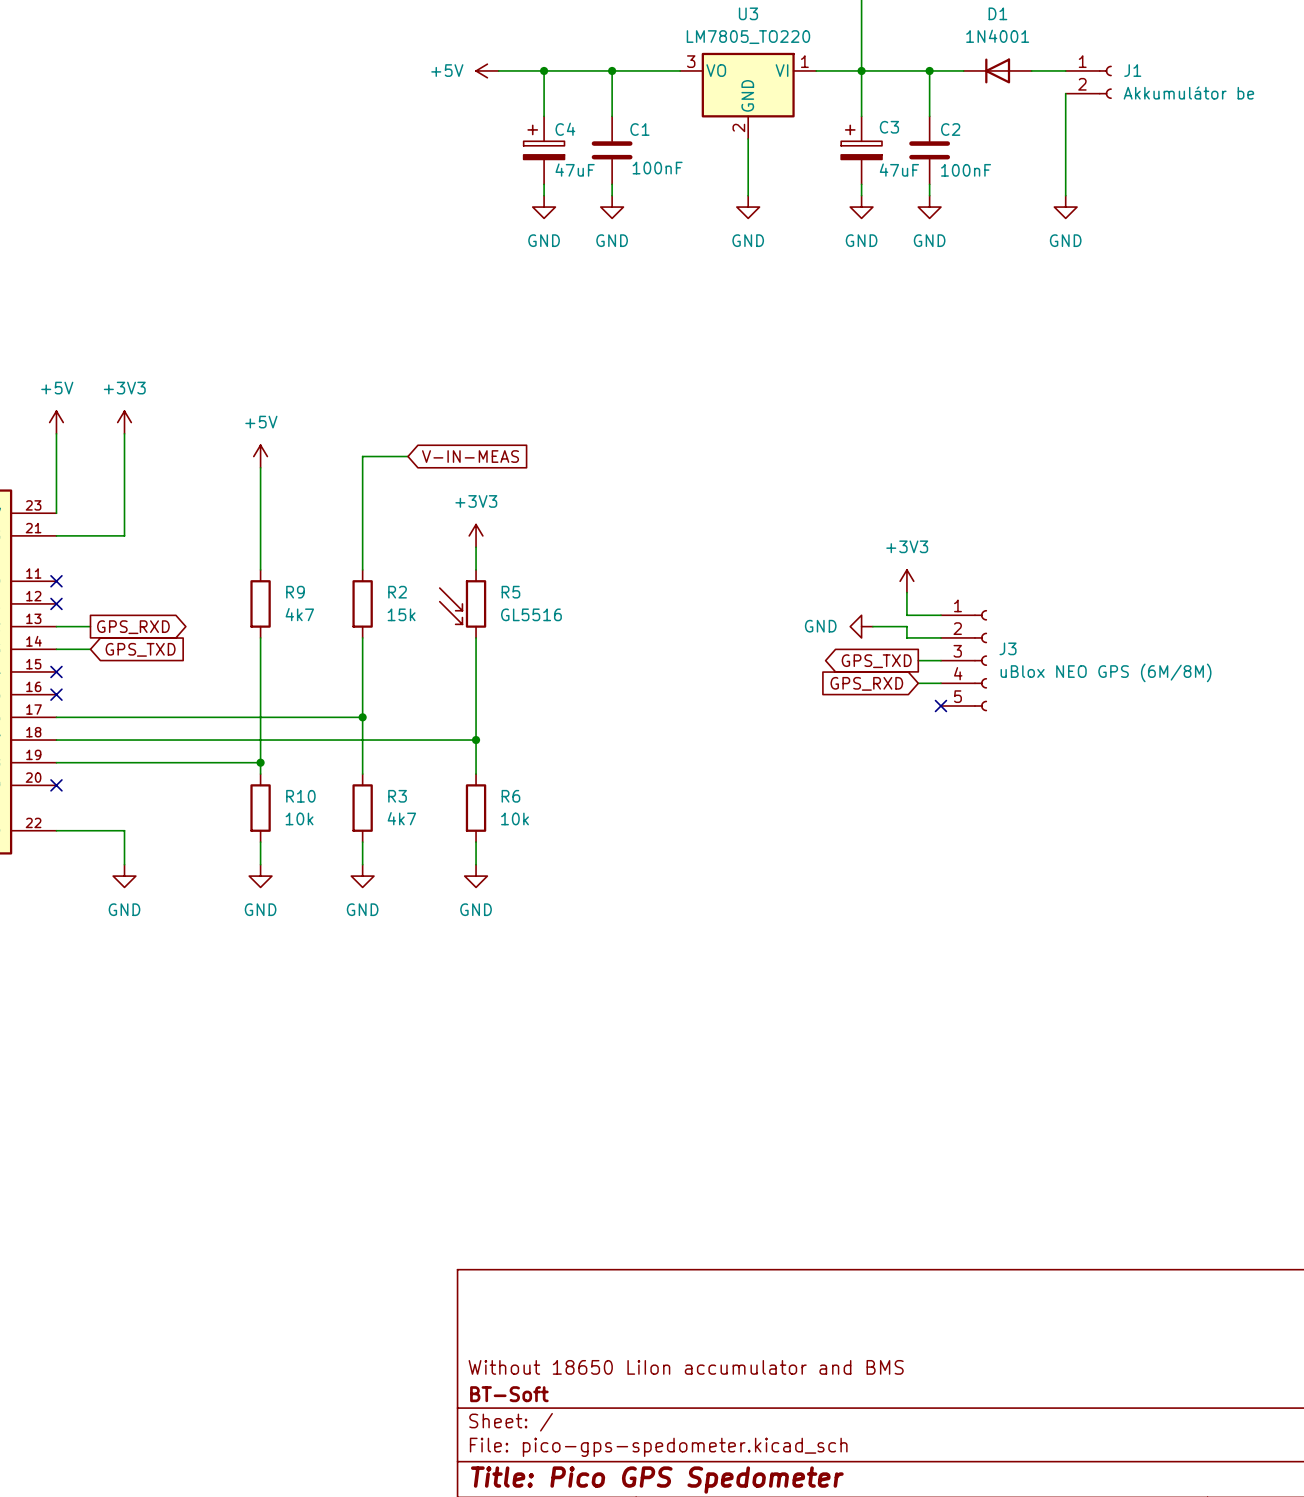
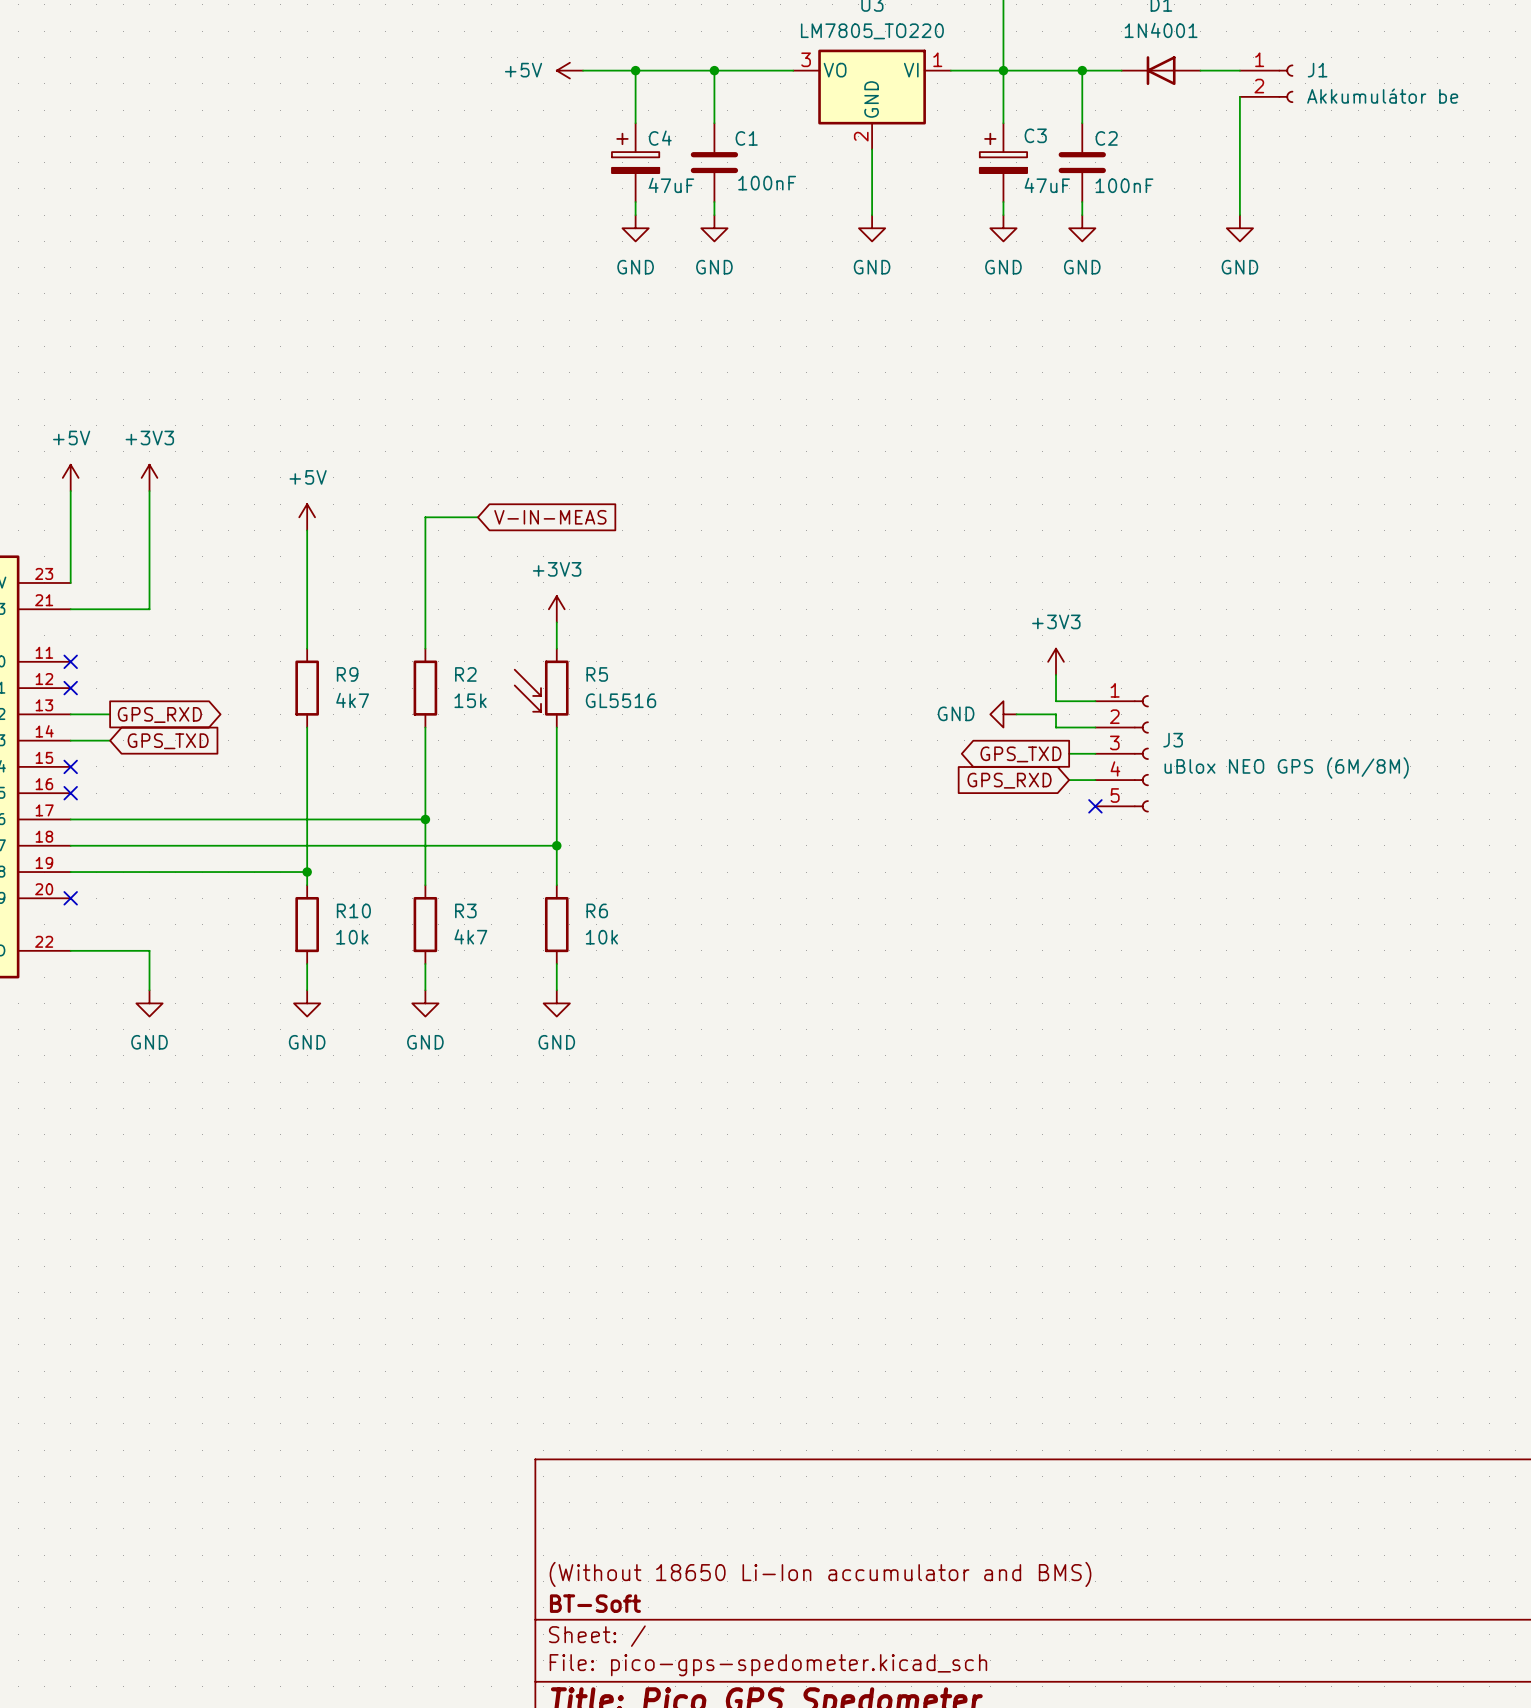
title block: Without 18650 LiIon accumulator and BMS (686, 1367) -> (Without 18650 Li-Ion accumulator and BMS) (820, 1574)

